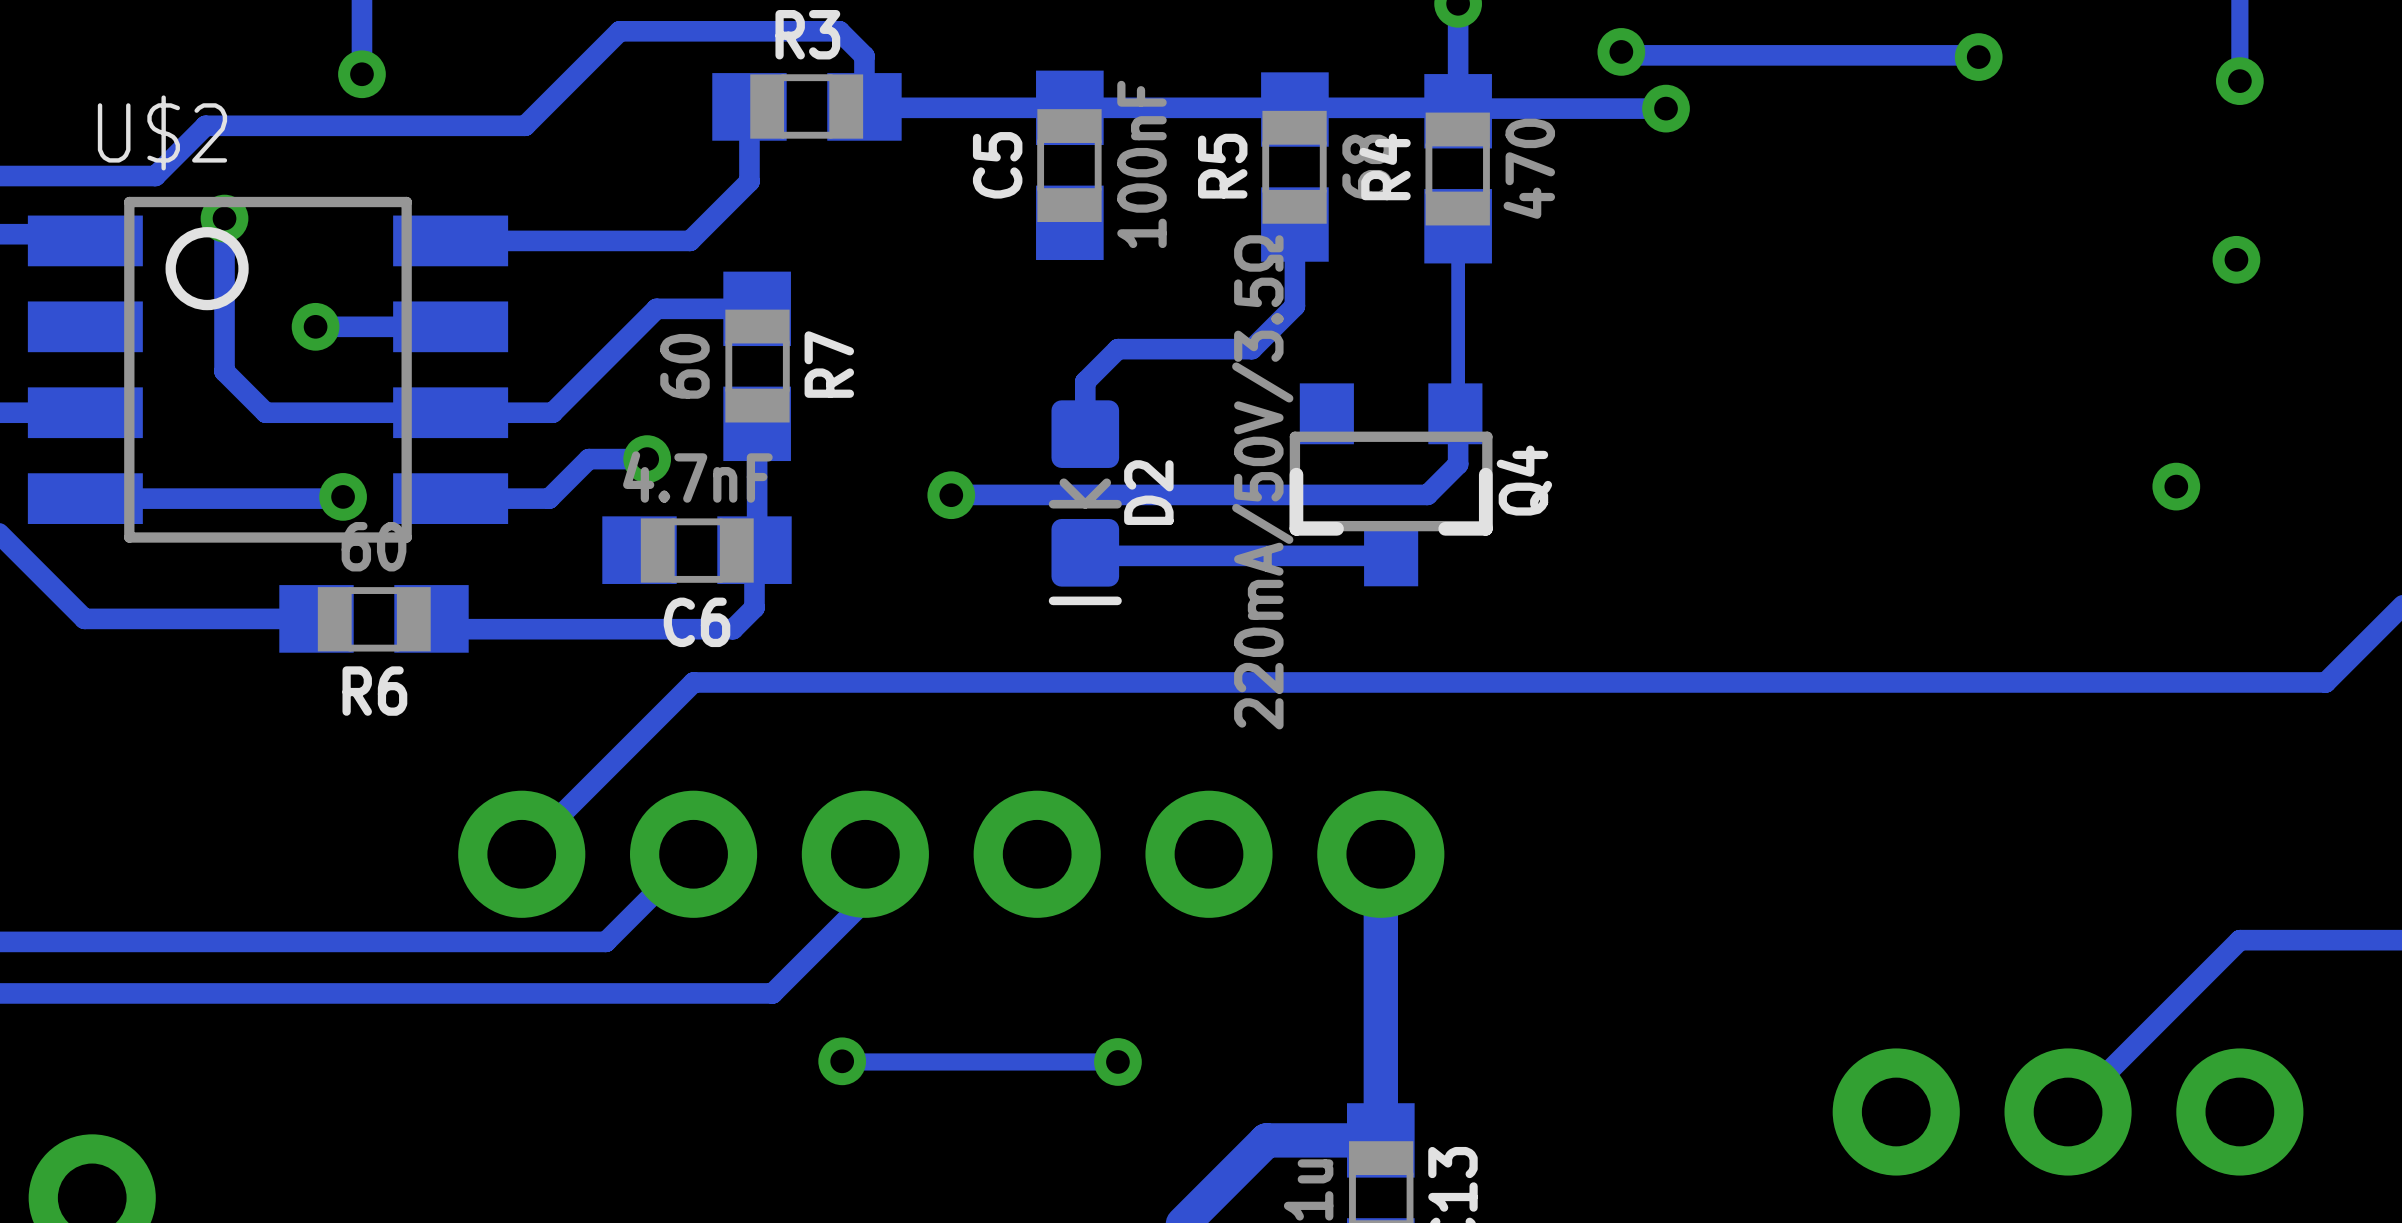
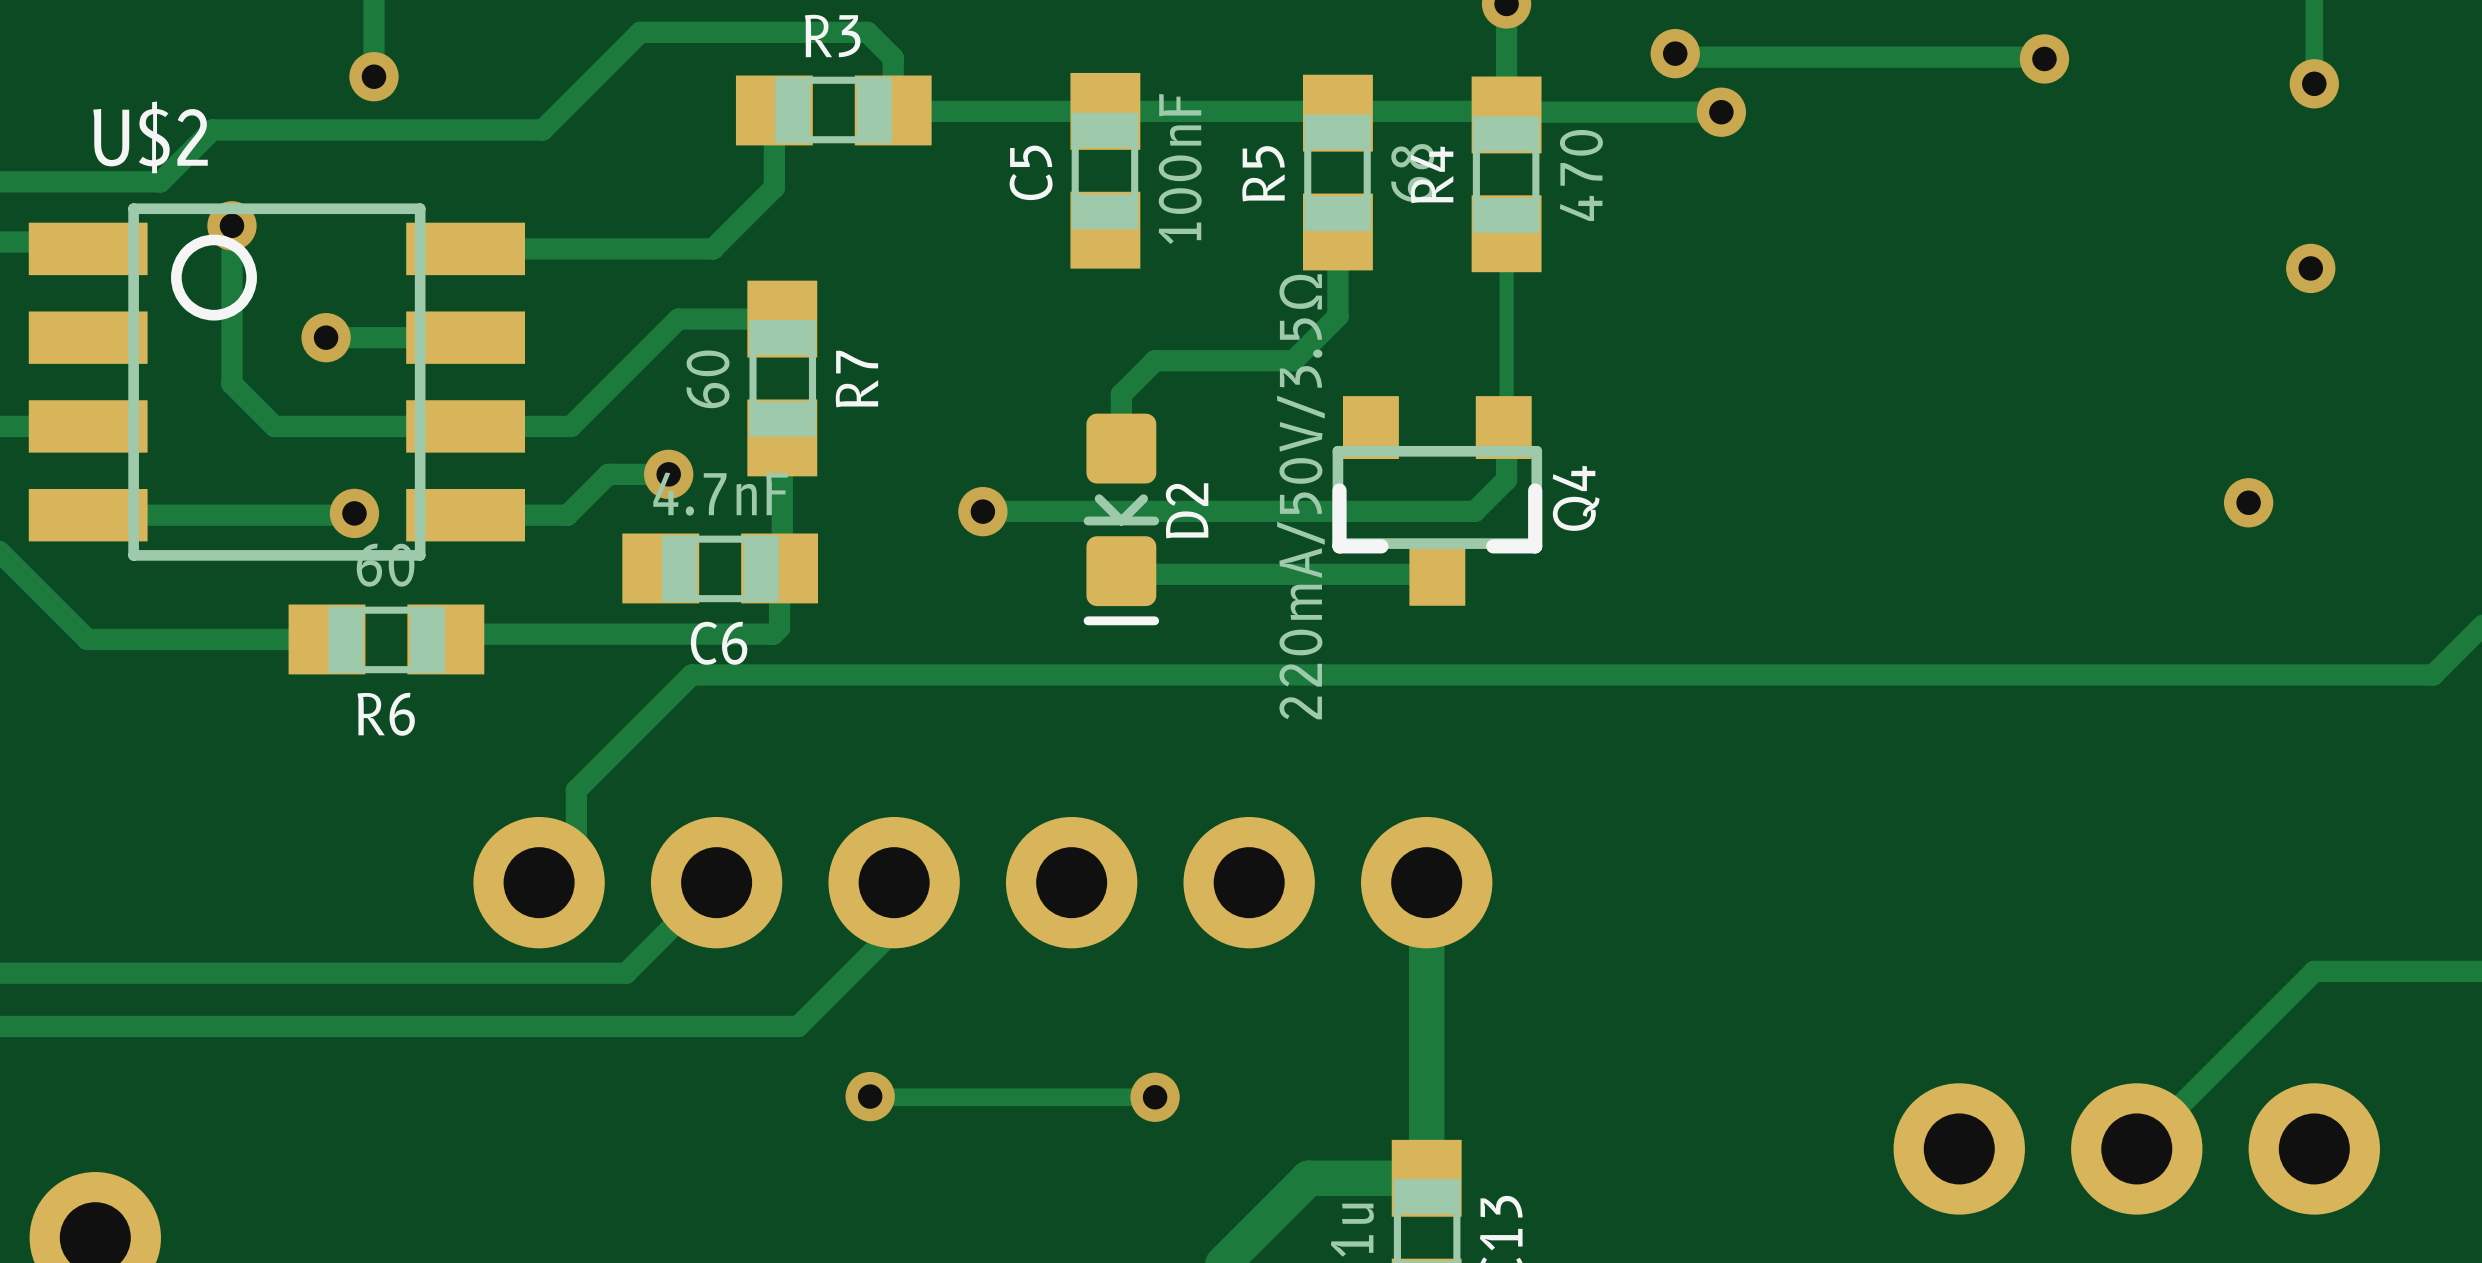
track: (748, 613) (733, 629) (441, 629) (431, 618) -> (773, 634) (451, 634) (445, 639)
track: (2354, 653) (2325, 682) (693, 682) (557, 818) -> (2433, 674) (691, 674) (576, 790) (576, 845)

